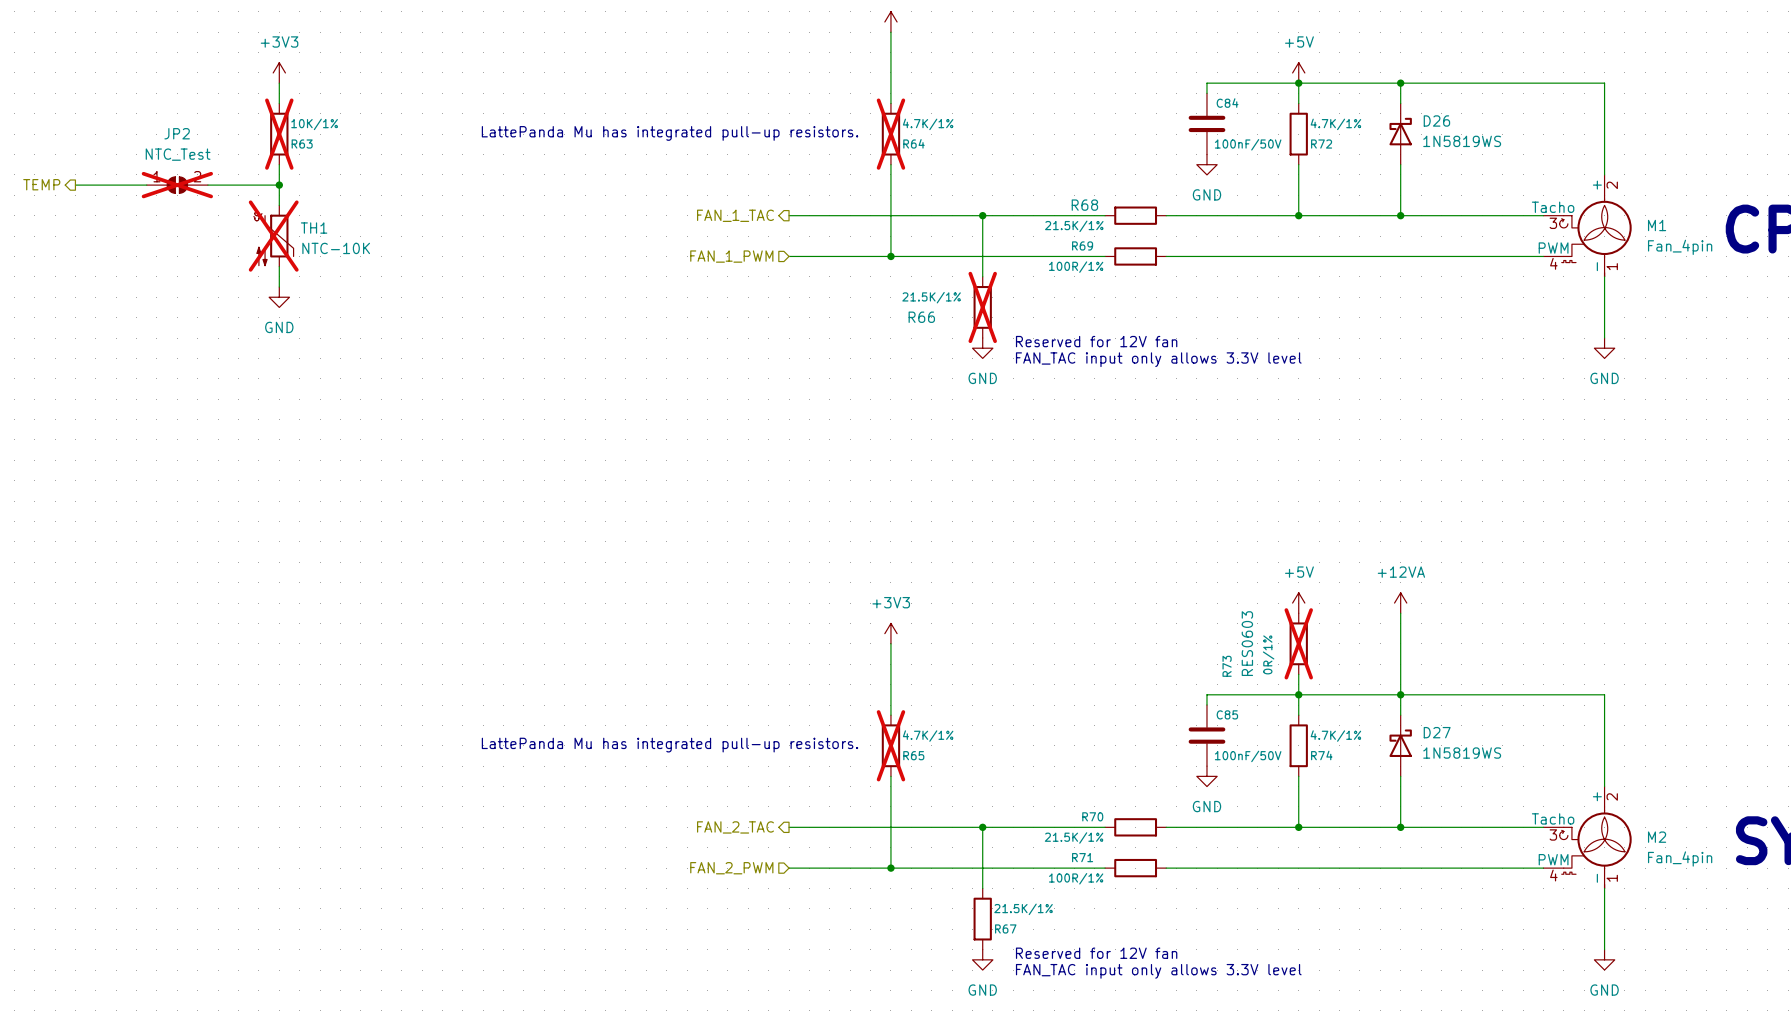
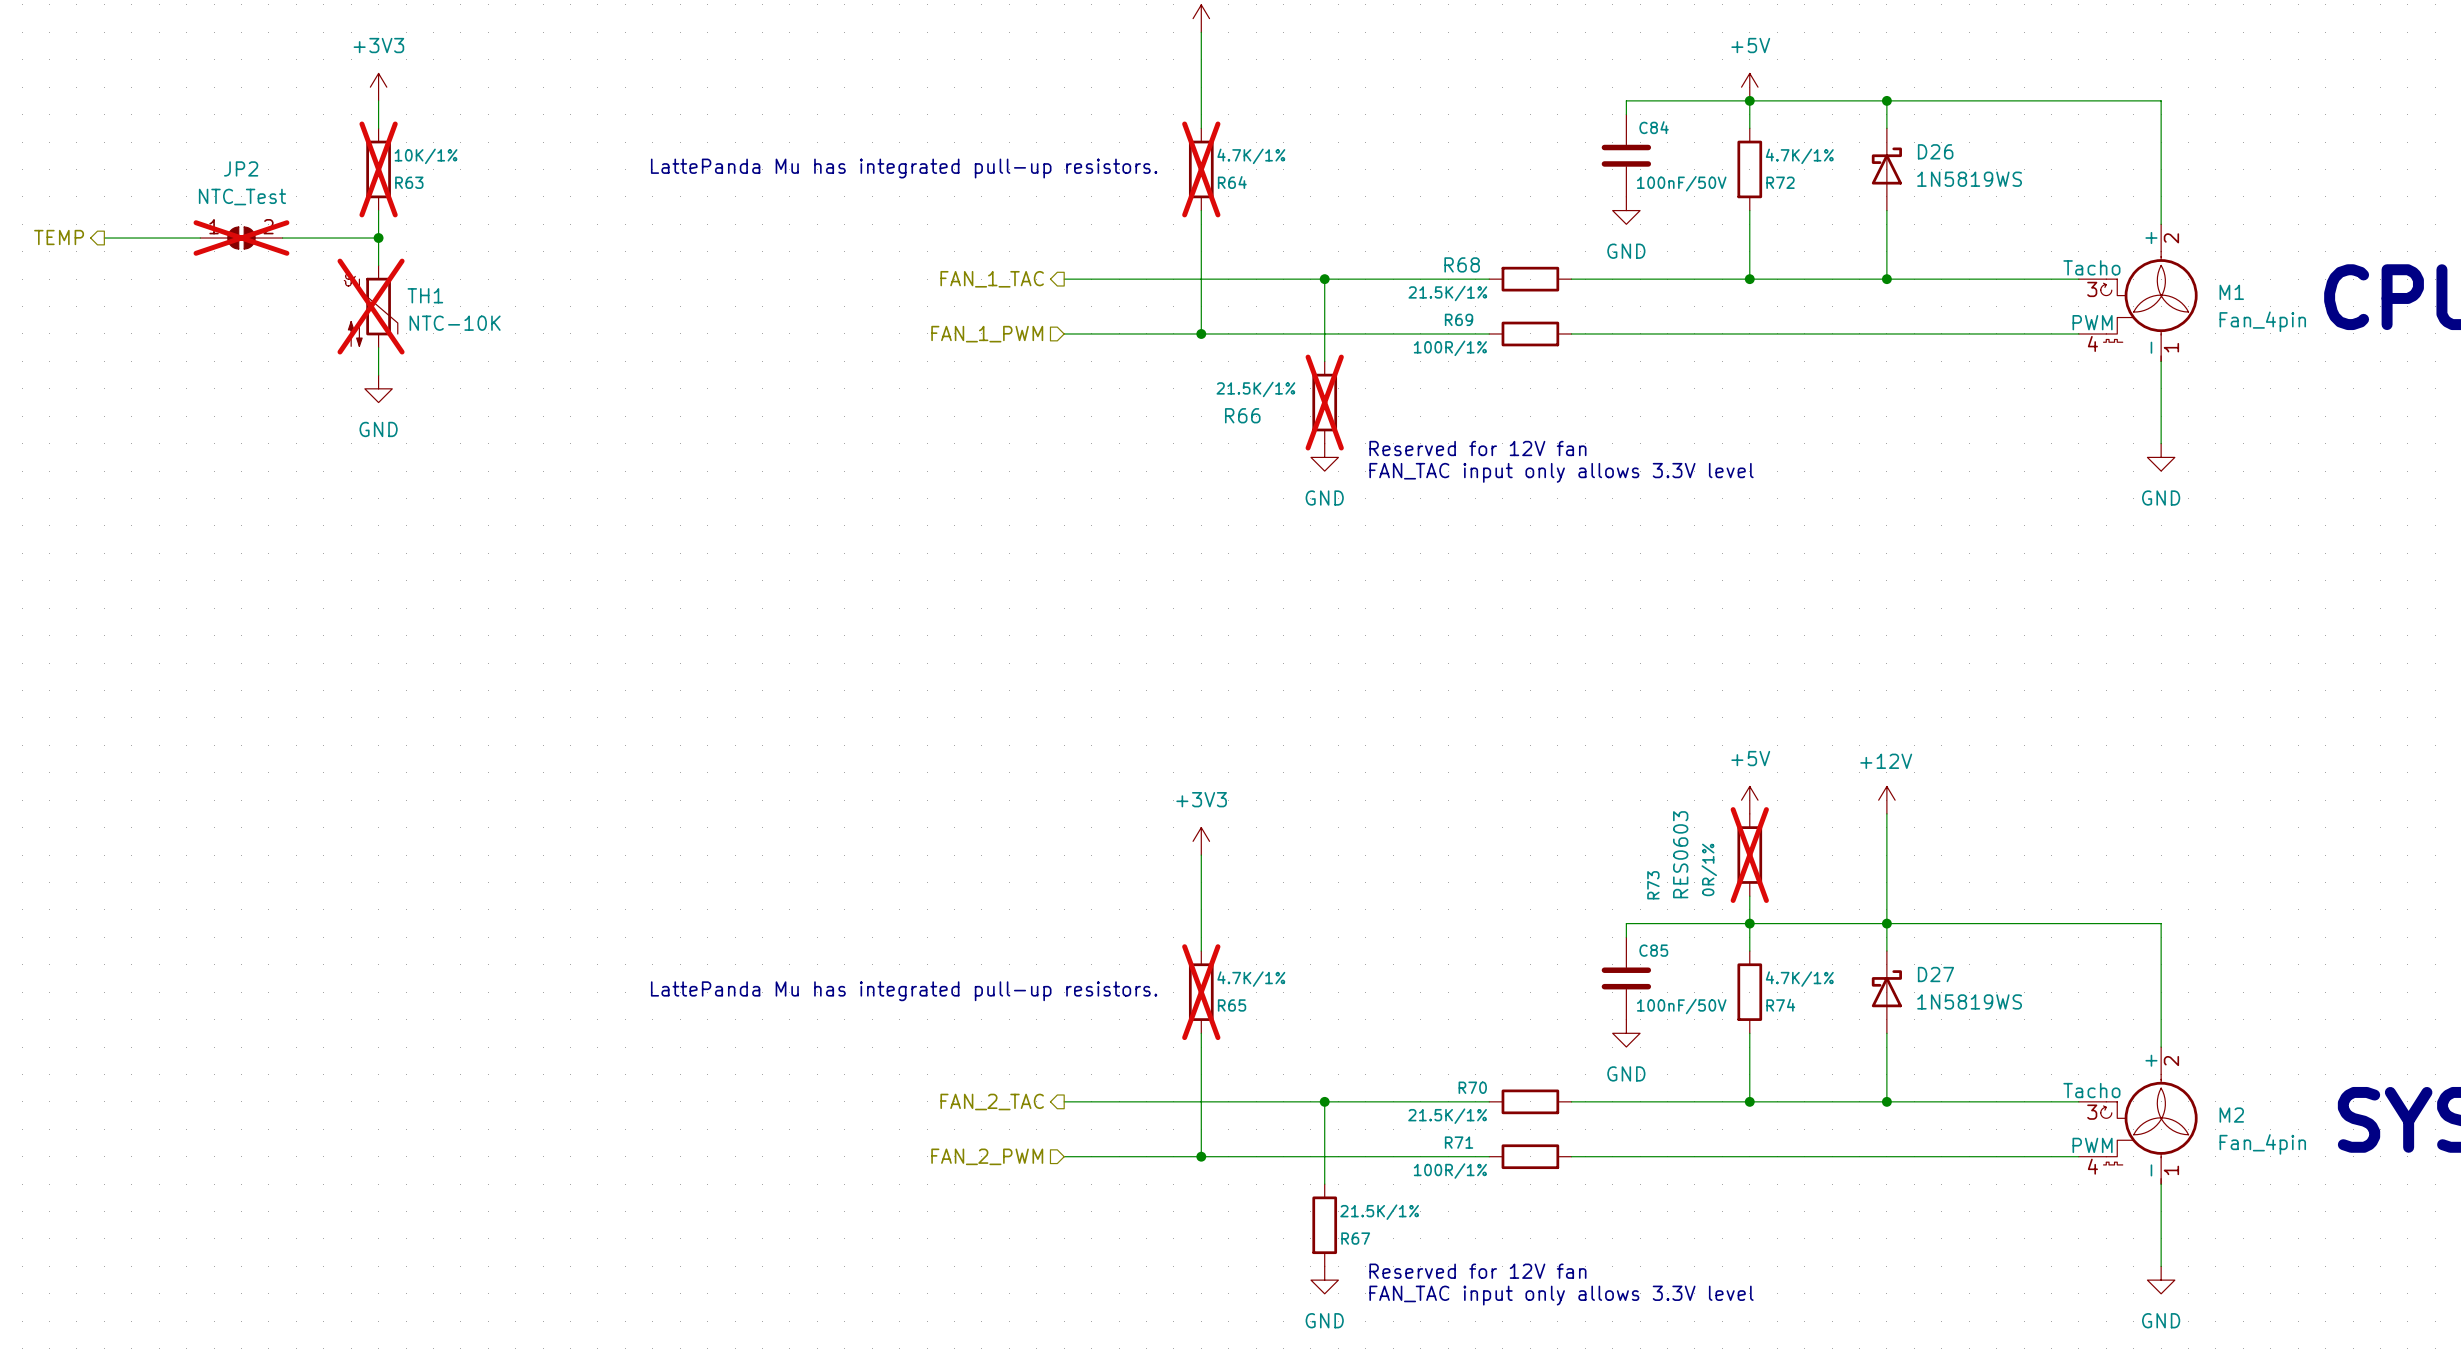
power symbol: +12VA (1400, 603) -> +12V (1886, 800)

